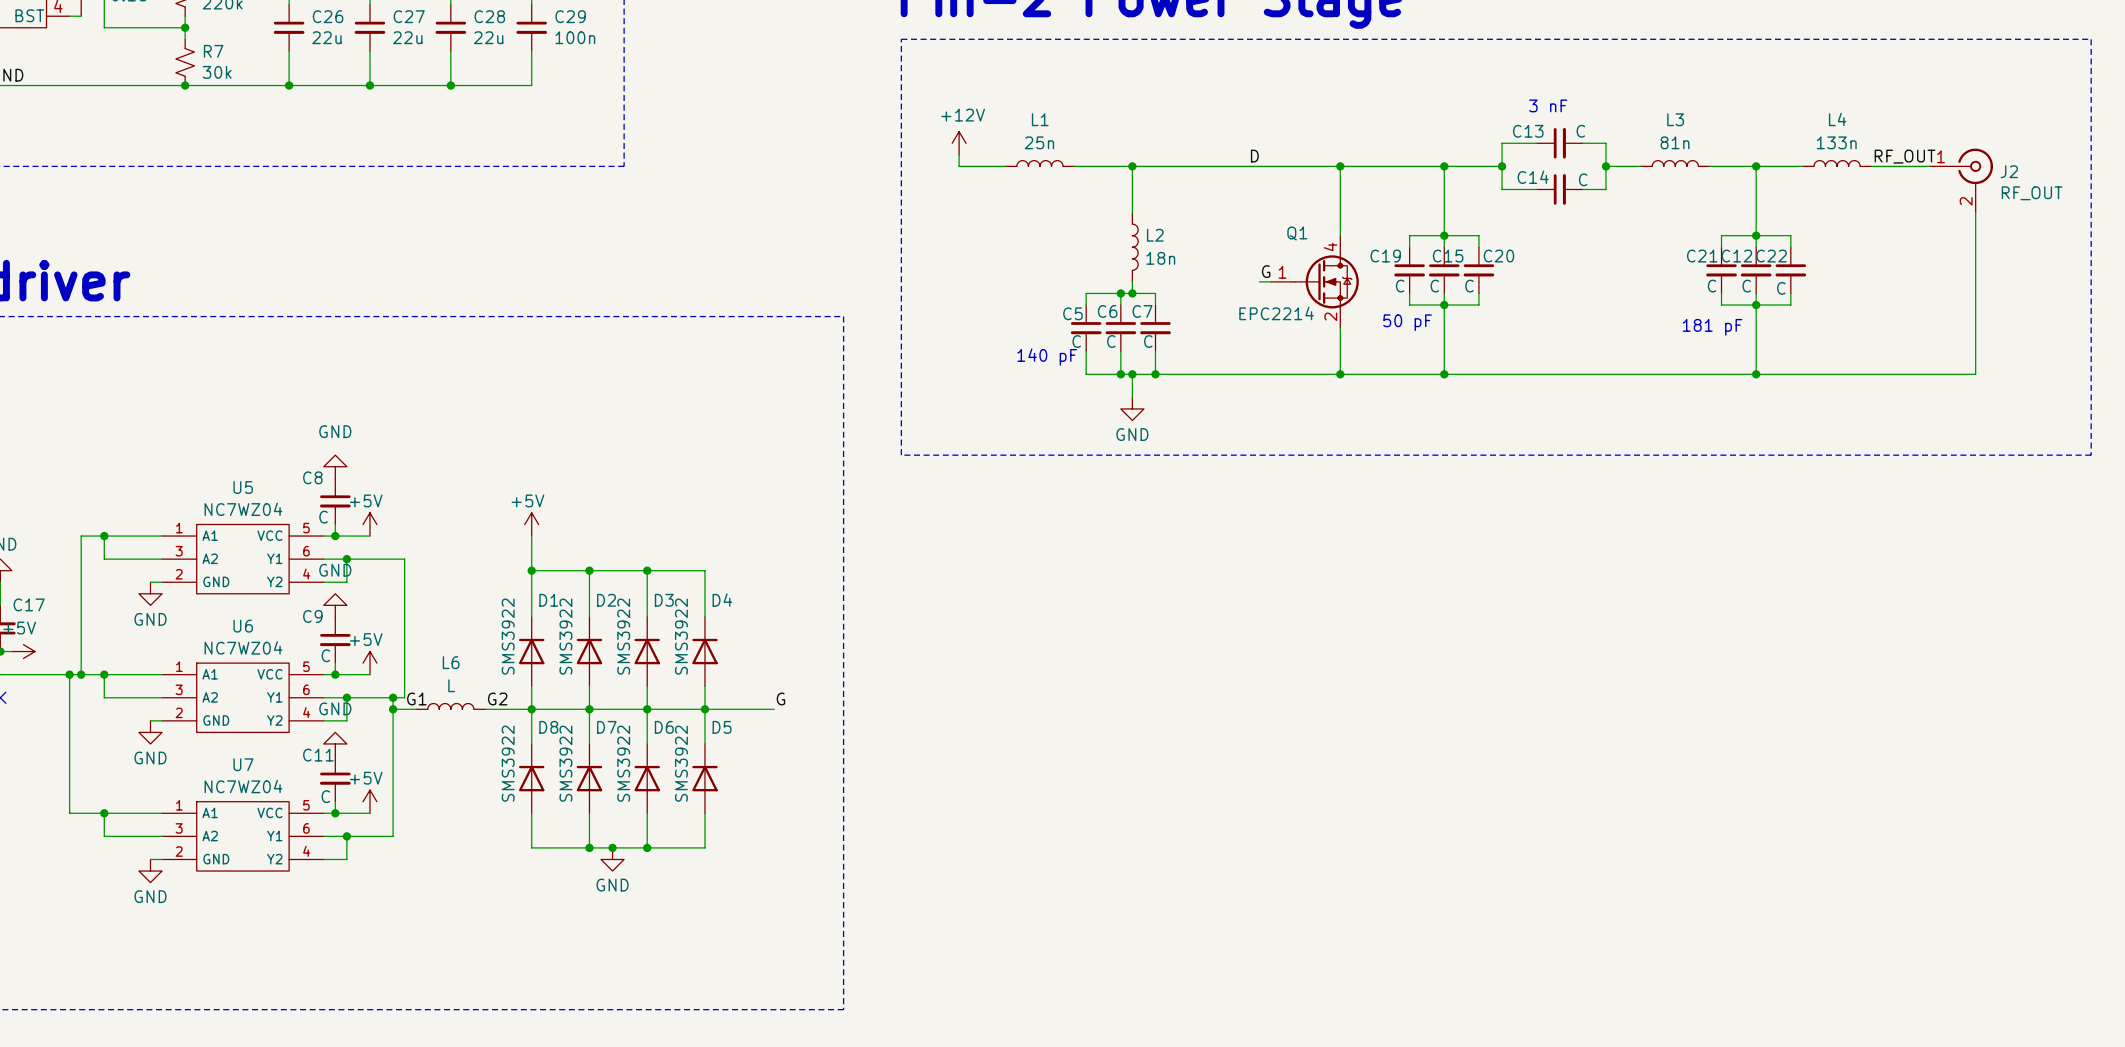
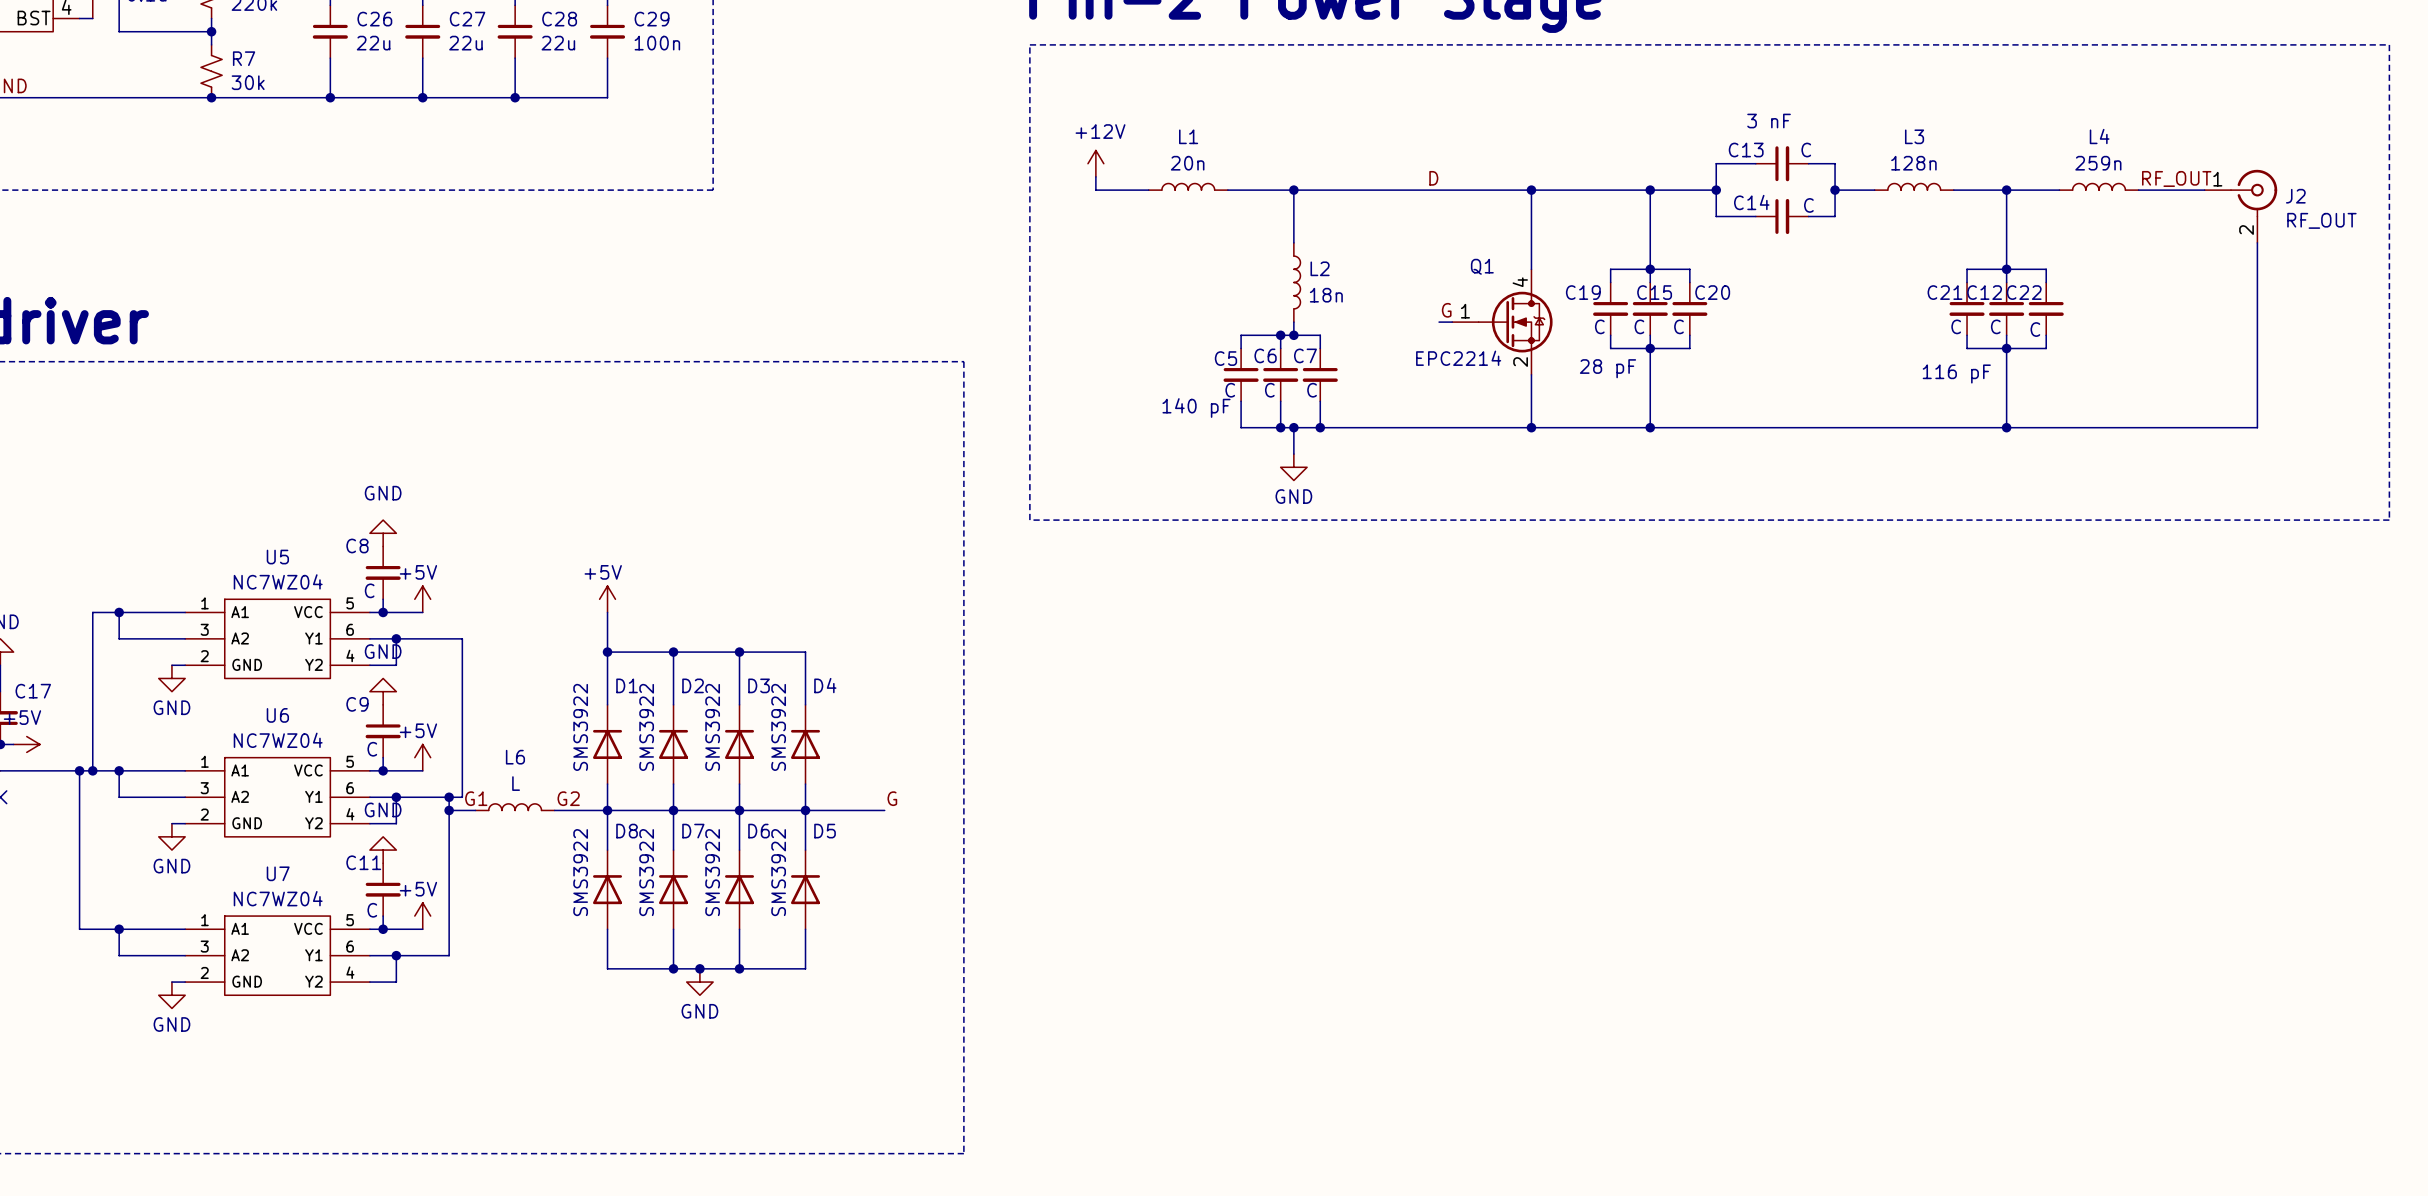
L1 value: 25n (1039, 142) -> 20n (1187, 163)
L3 value: 81n (1675, 142) -> 128n (1913, 163)
L4 value: 133n (1836, 142) -> 259n (2098, 163)
text: 50 pF (1407, 322) -> 28 pF (1608, 368)
text: 181 pF (1712, 327) -> 116 pF (1956, 374)

